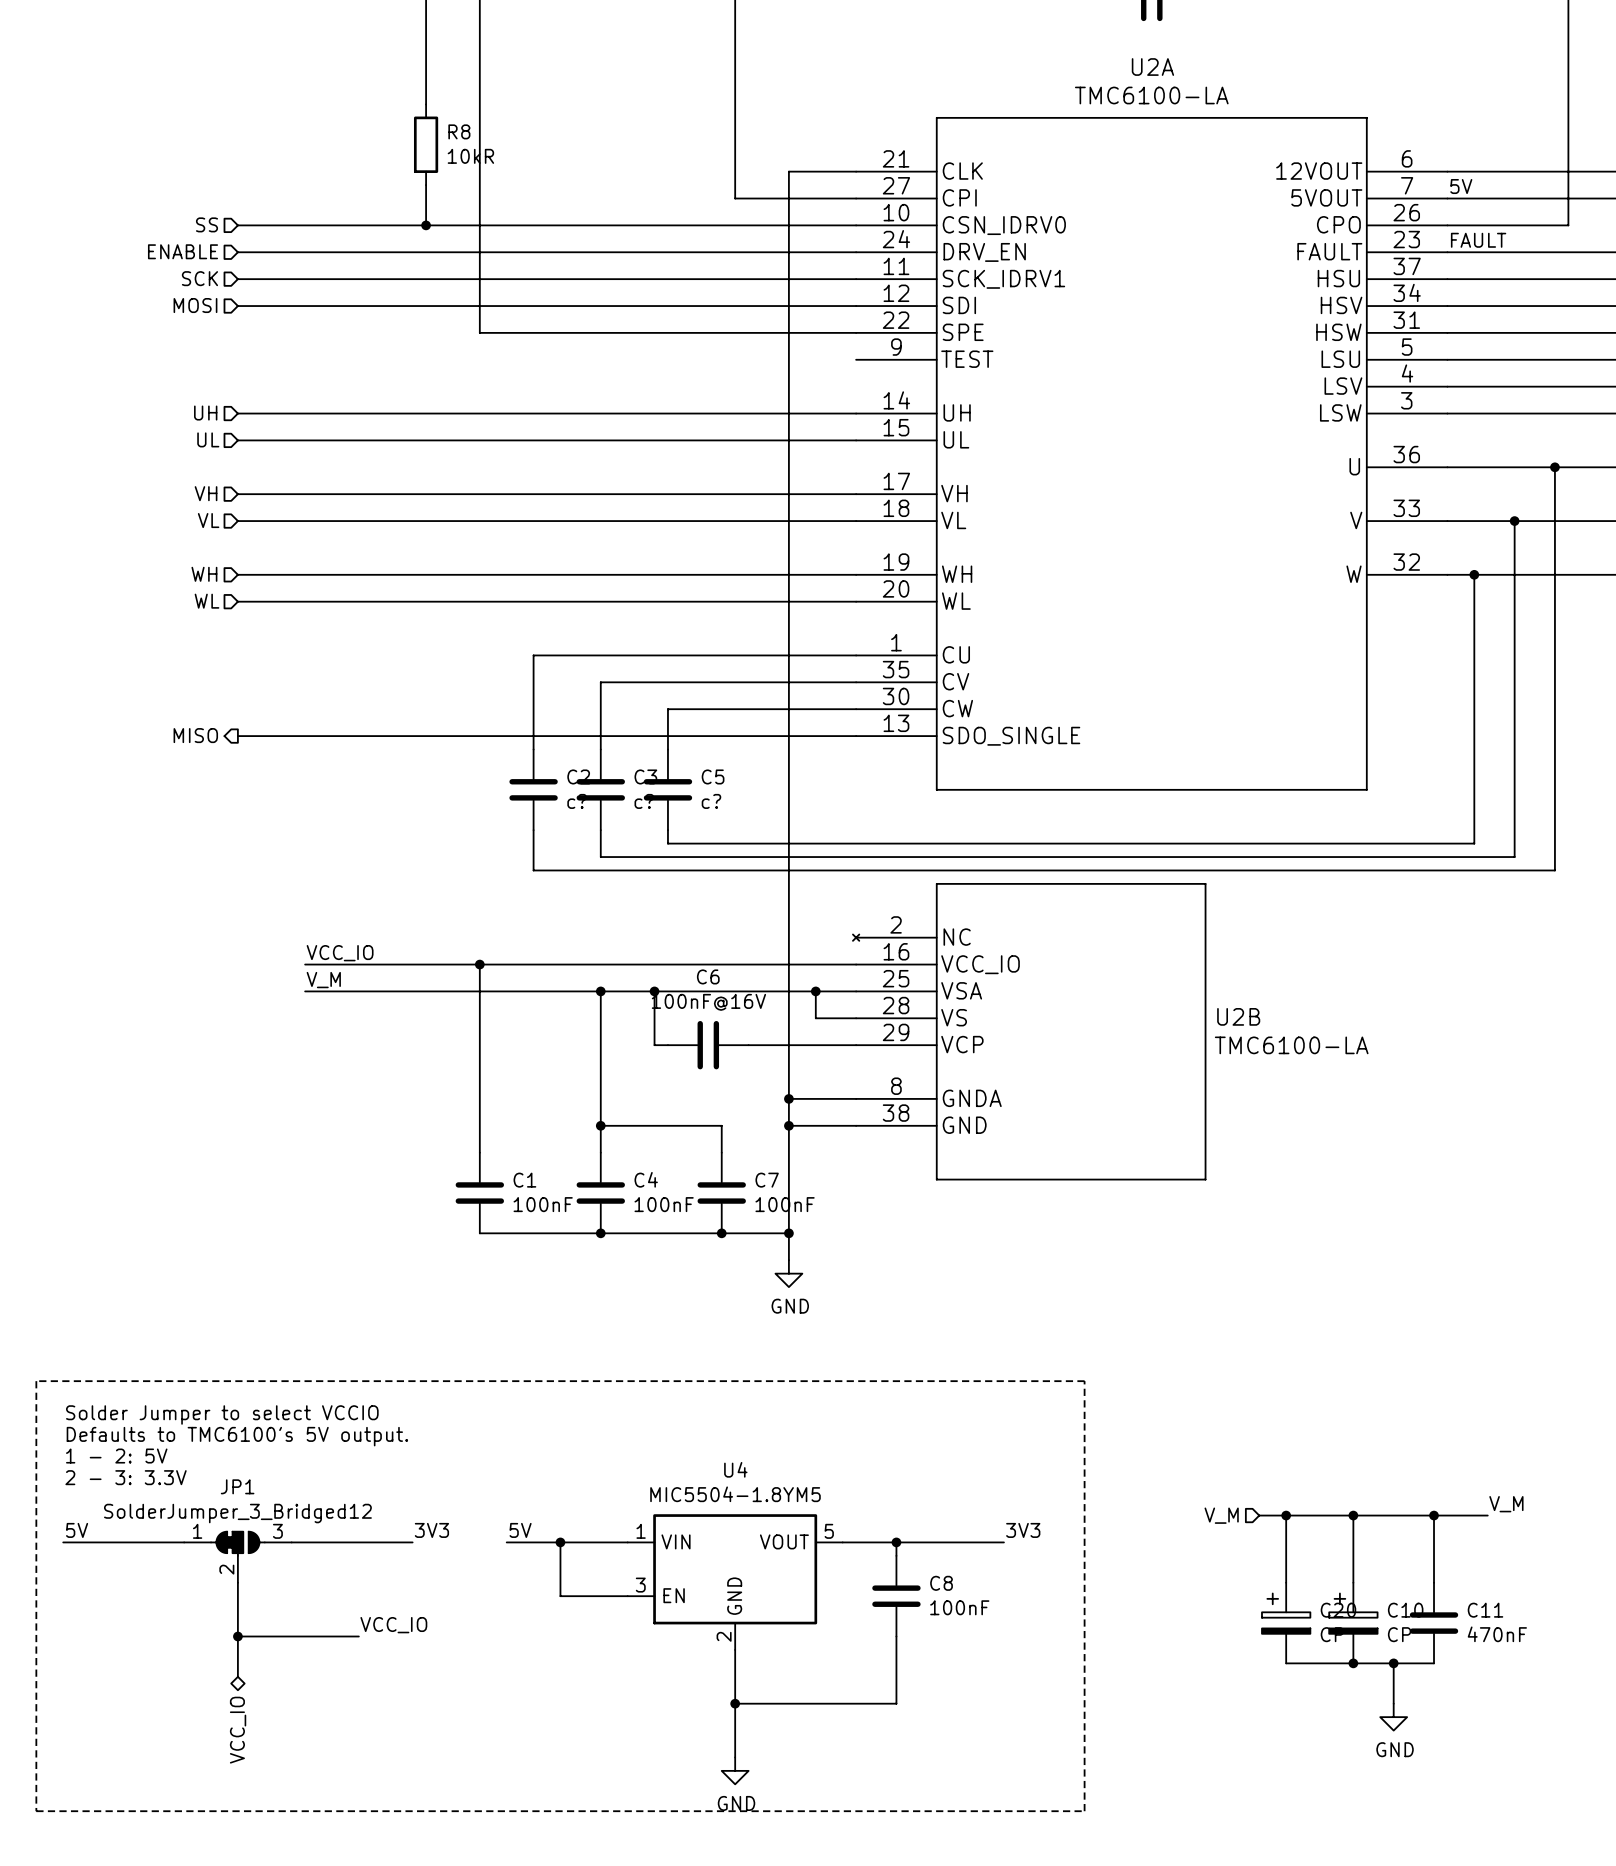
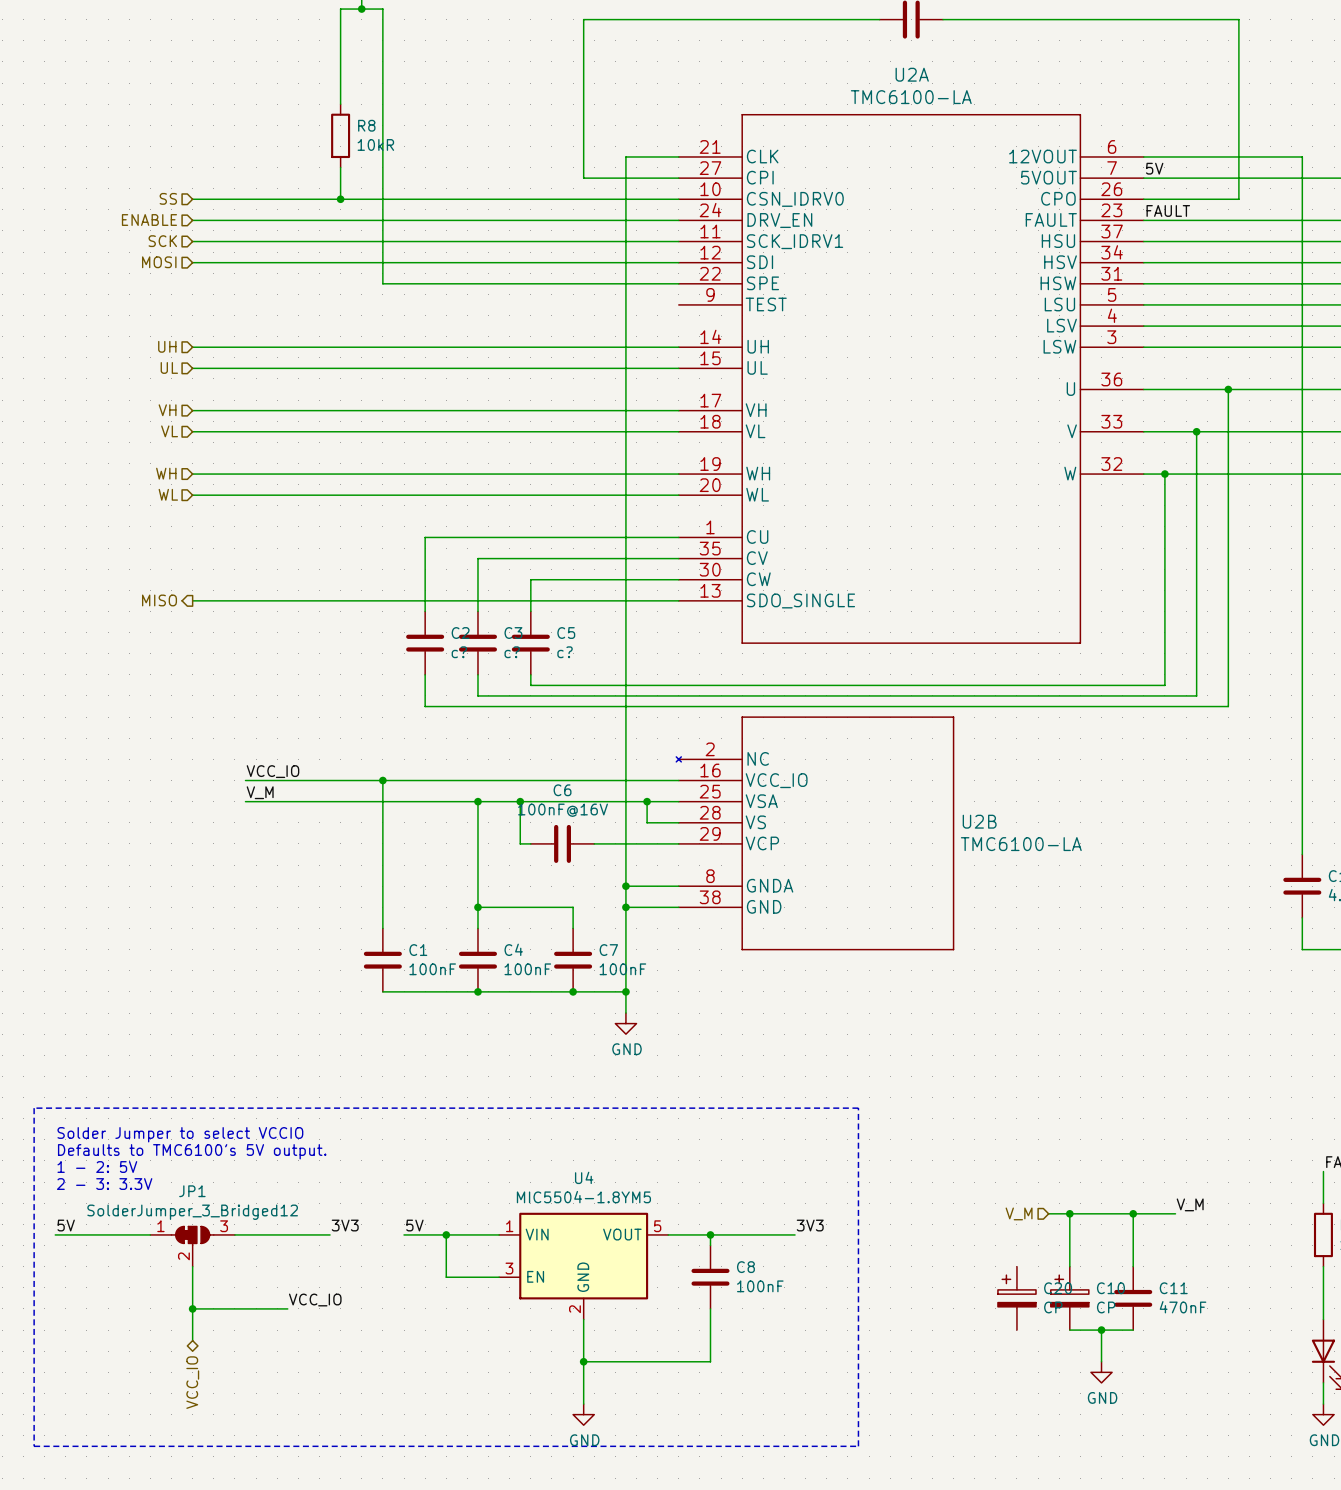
hierarchical label position: V_M (1221, 1515) -> V_M (1019, 1213)
wire: (1259, 1515) (1326, 1515) -> none
wire: (1286, 1515) (1286, 1582) -> none
junction: (1286, 1515) -> none
wire: (1286, 1663) (1353, 1663) -> none
junction: (1353, 1663) -> none

